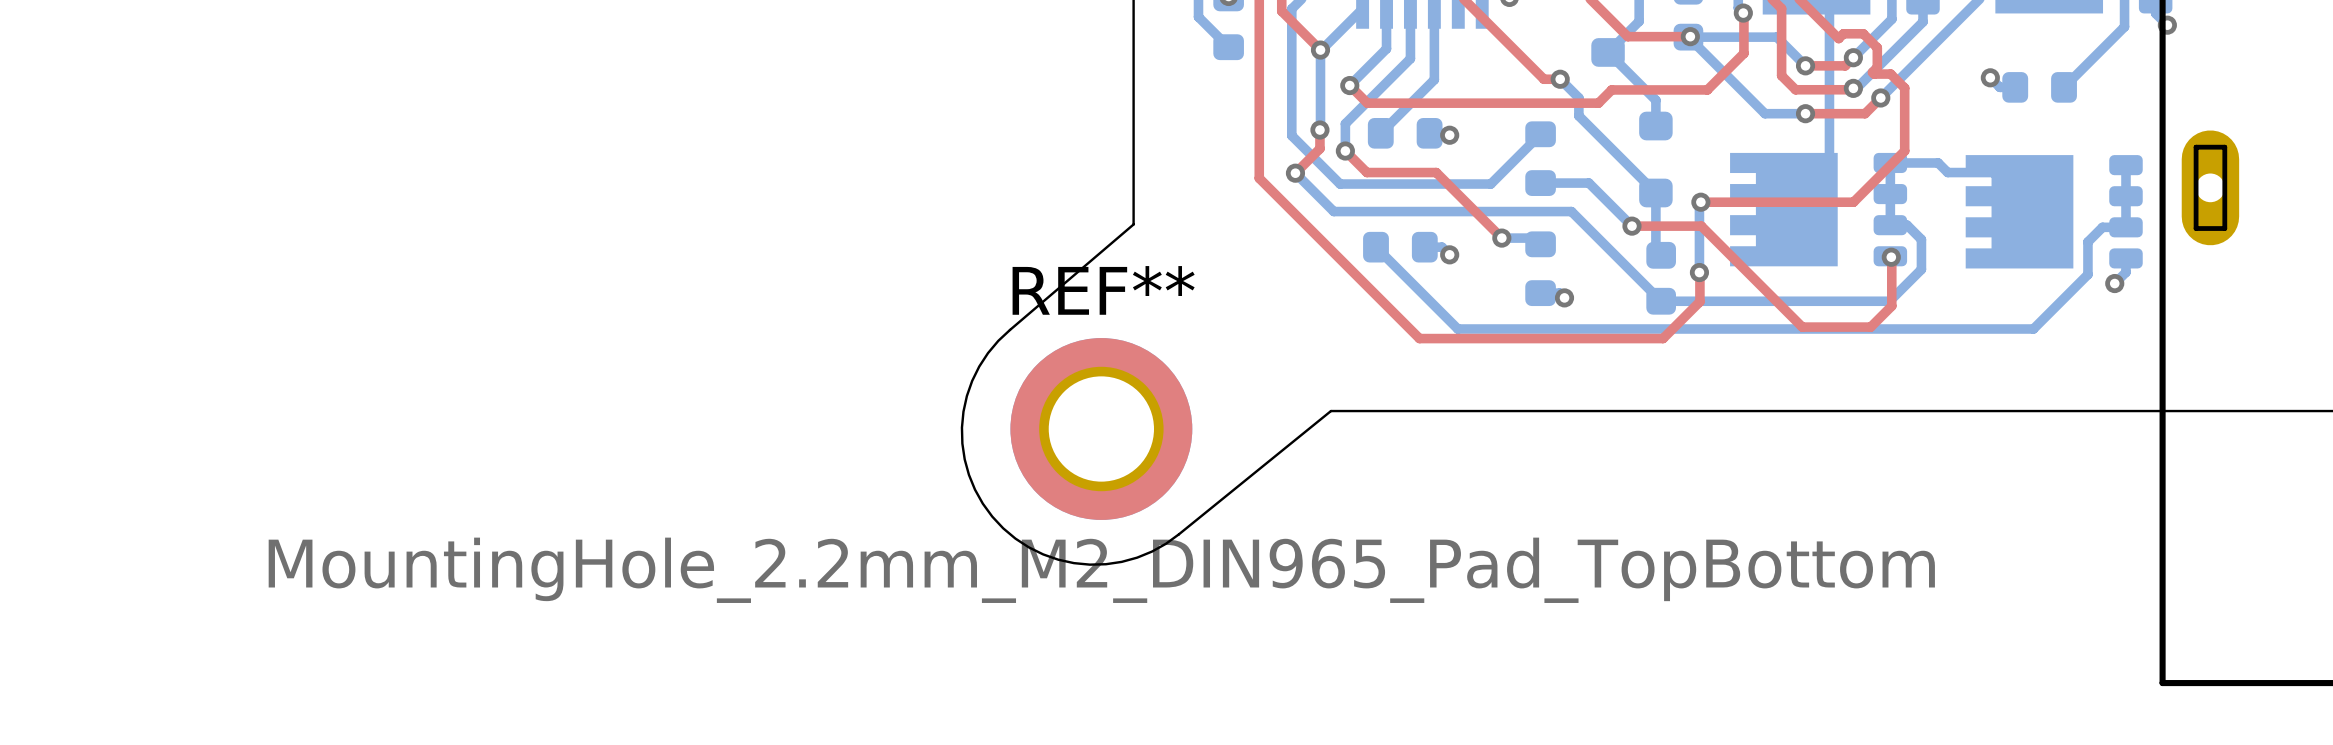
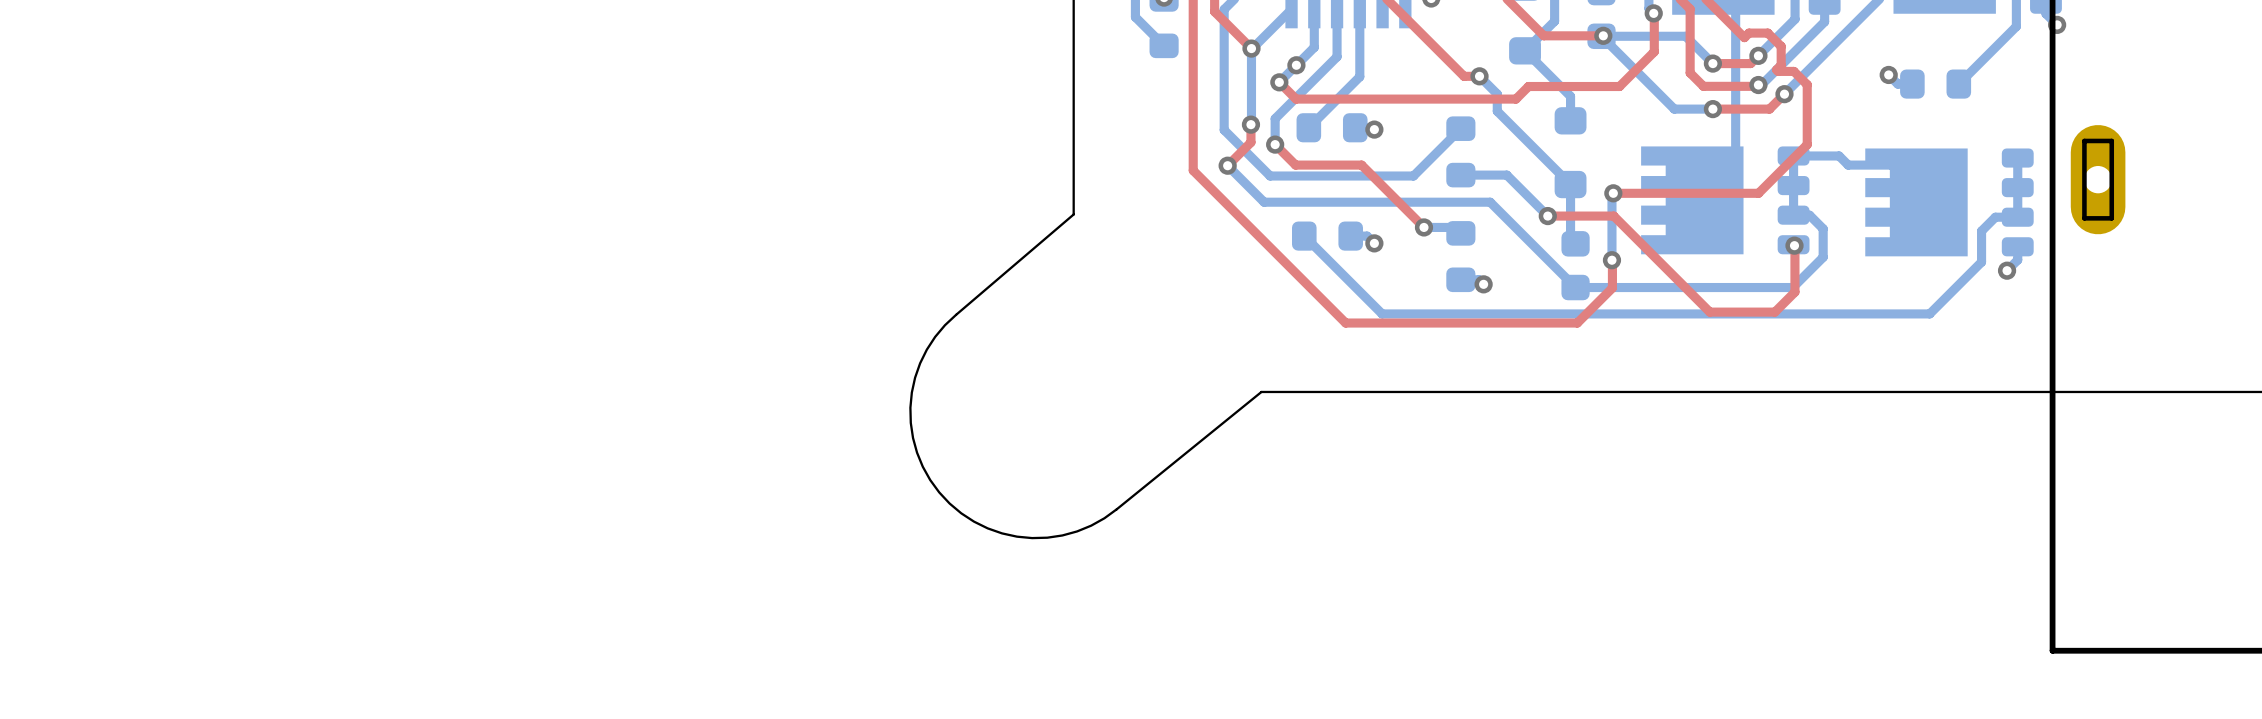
via: none -> (1296, 65)
REF**: MountingHole_2.2mm_M2_DIN965_Pad_TopBottom (1101, 429) -> none

